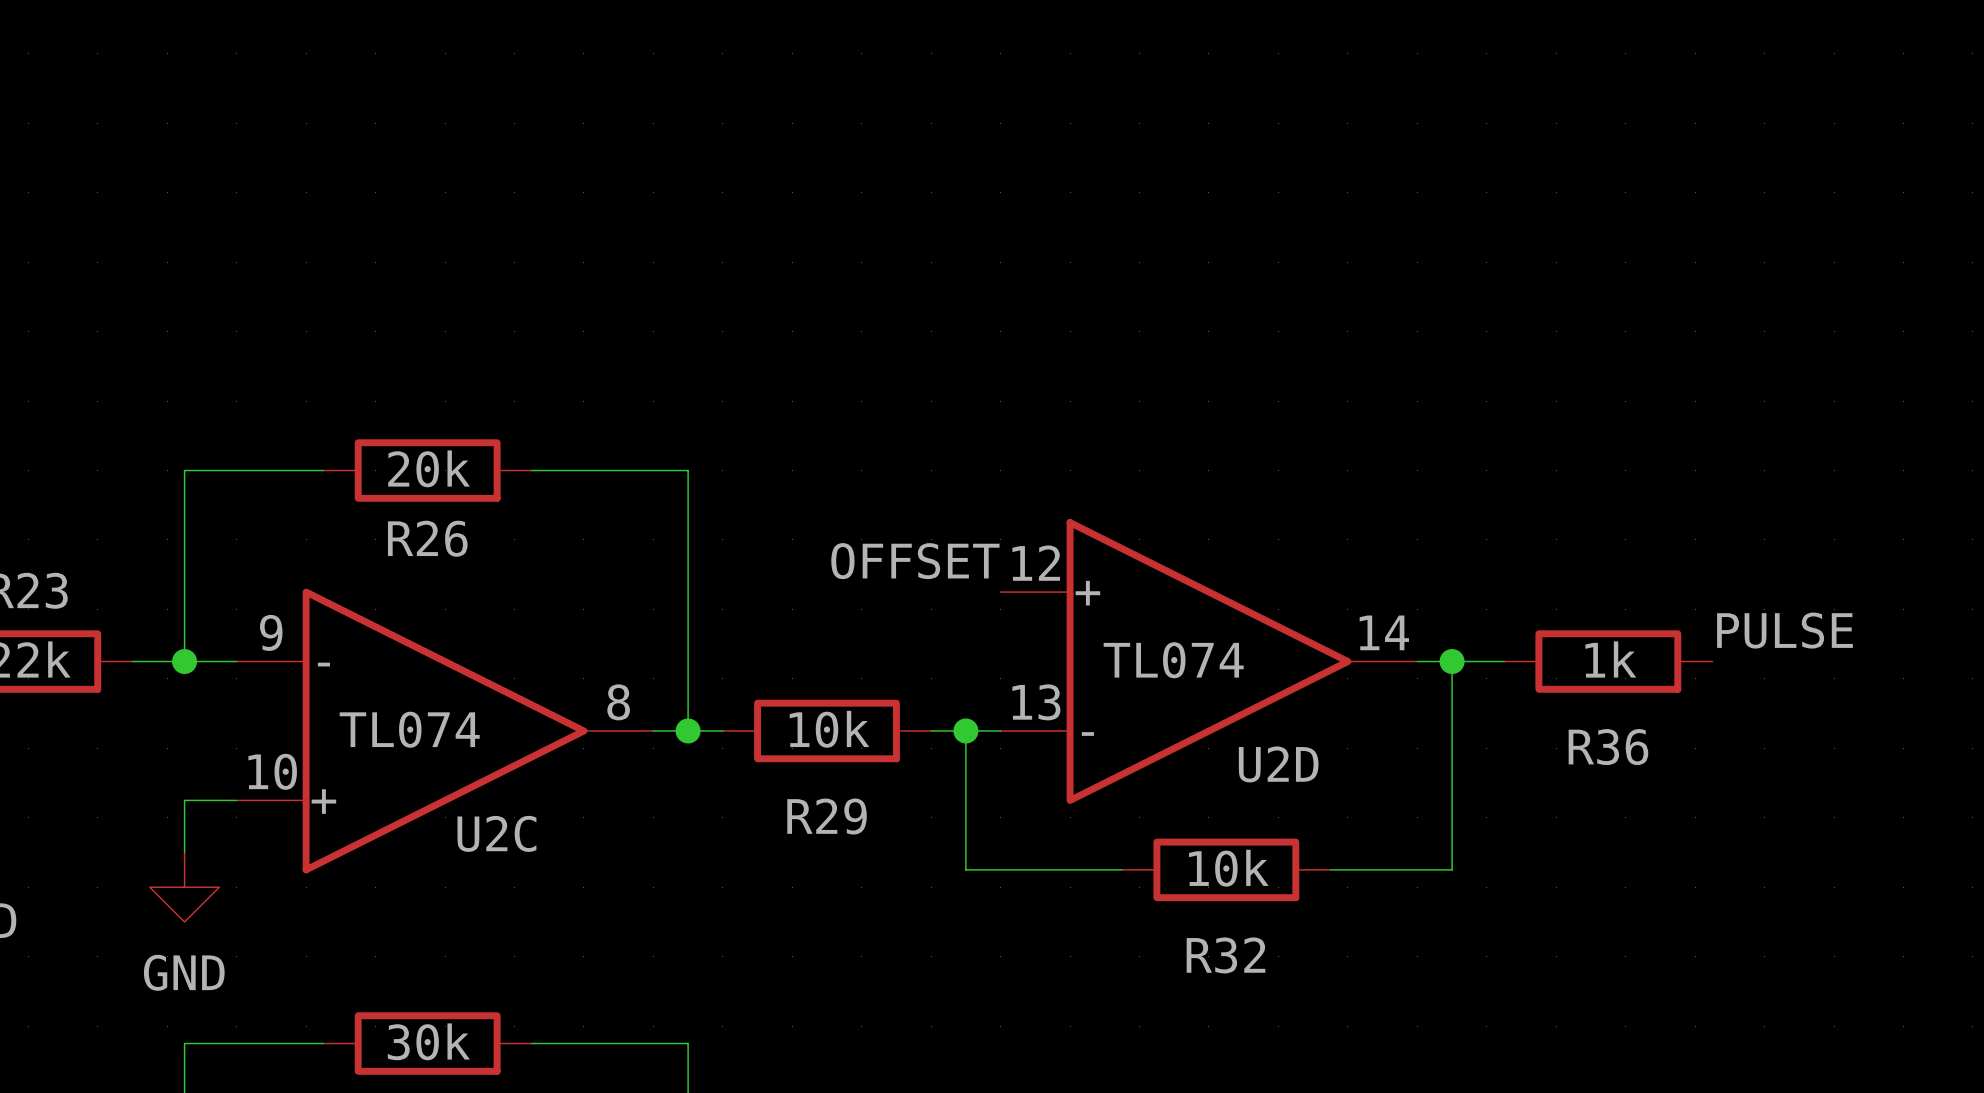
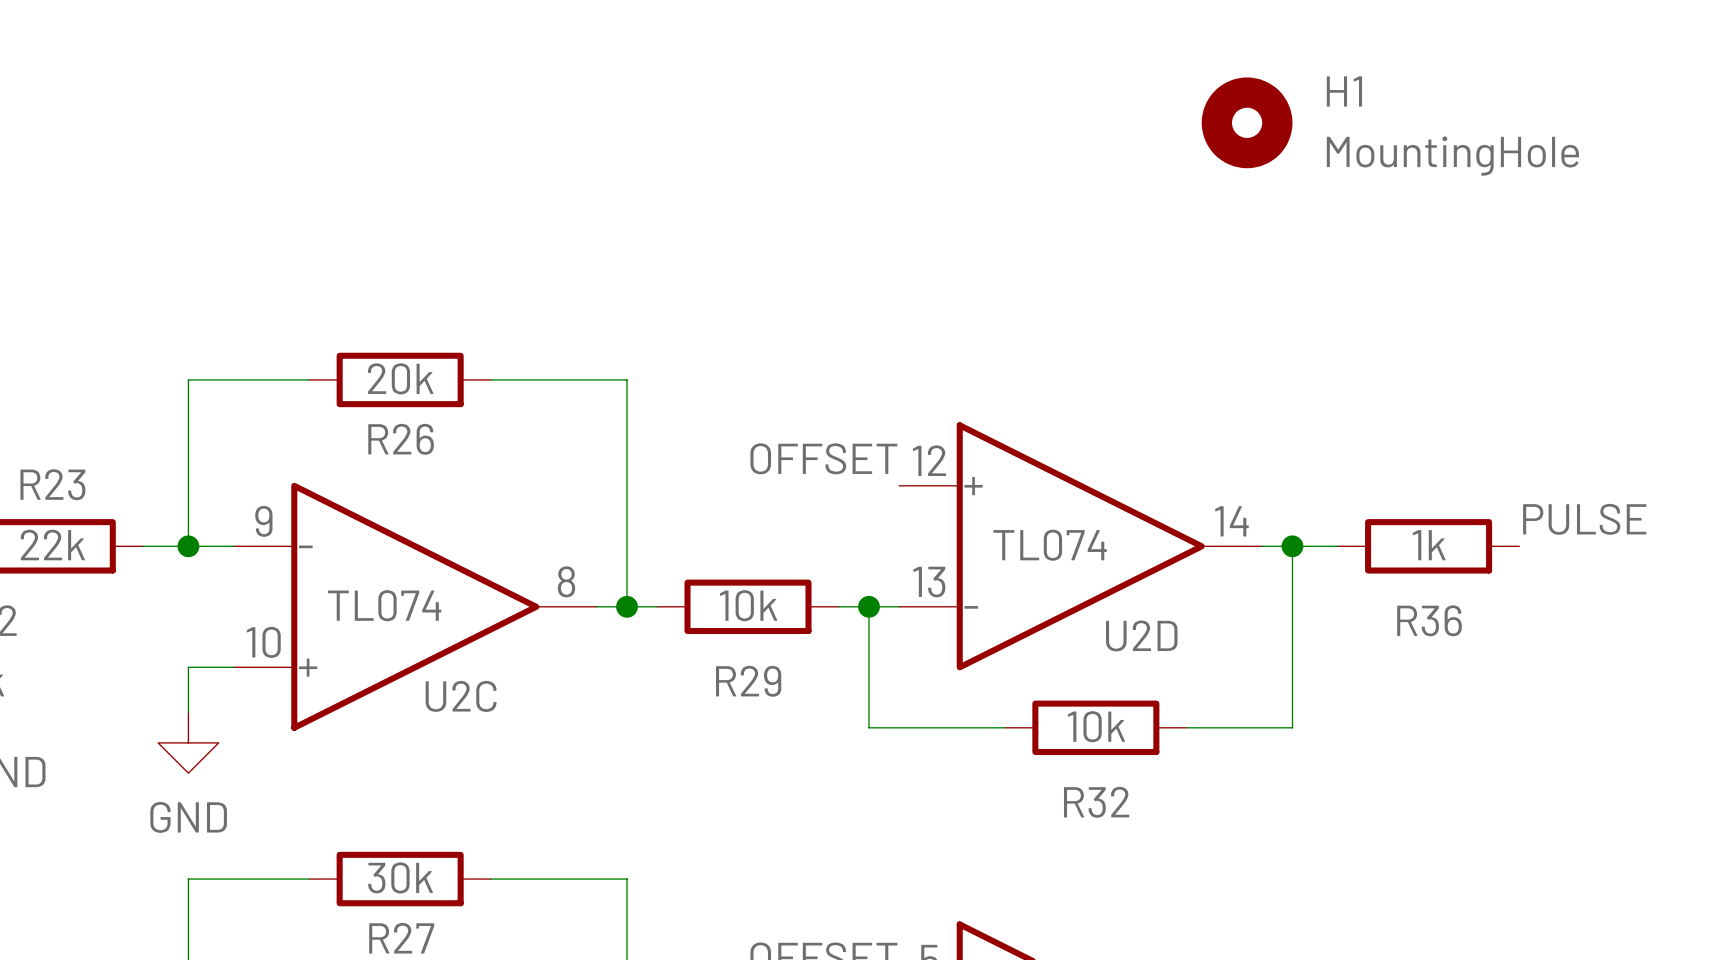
H1: none -> MountingHole (1247, 122)

